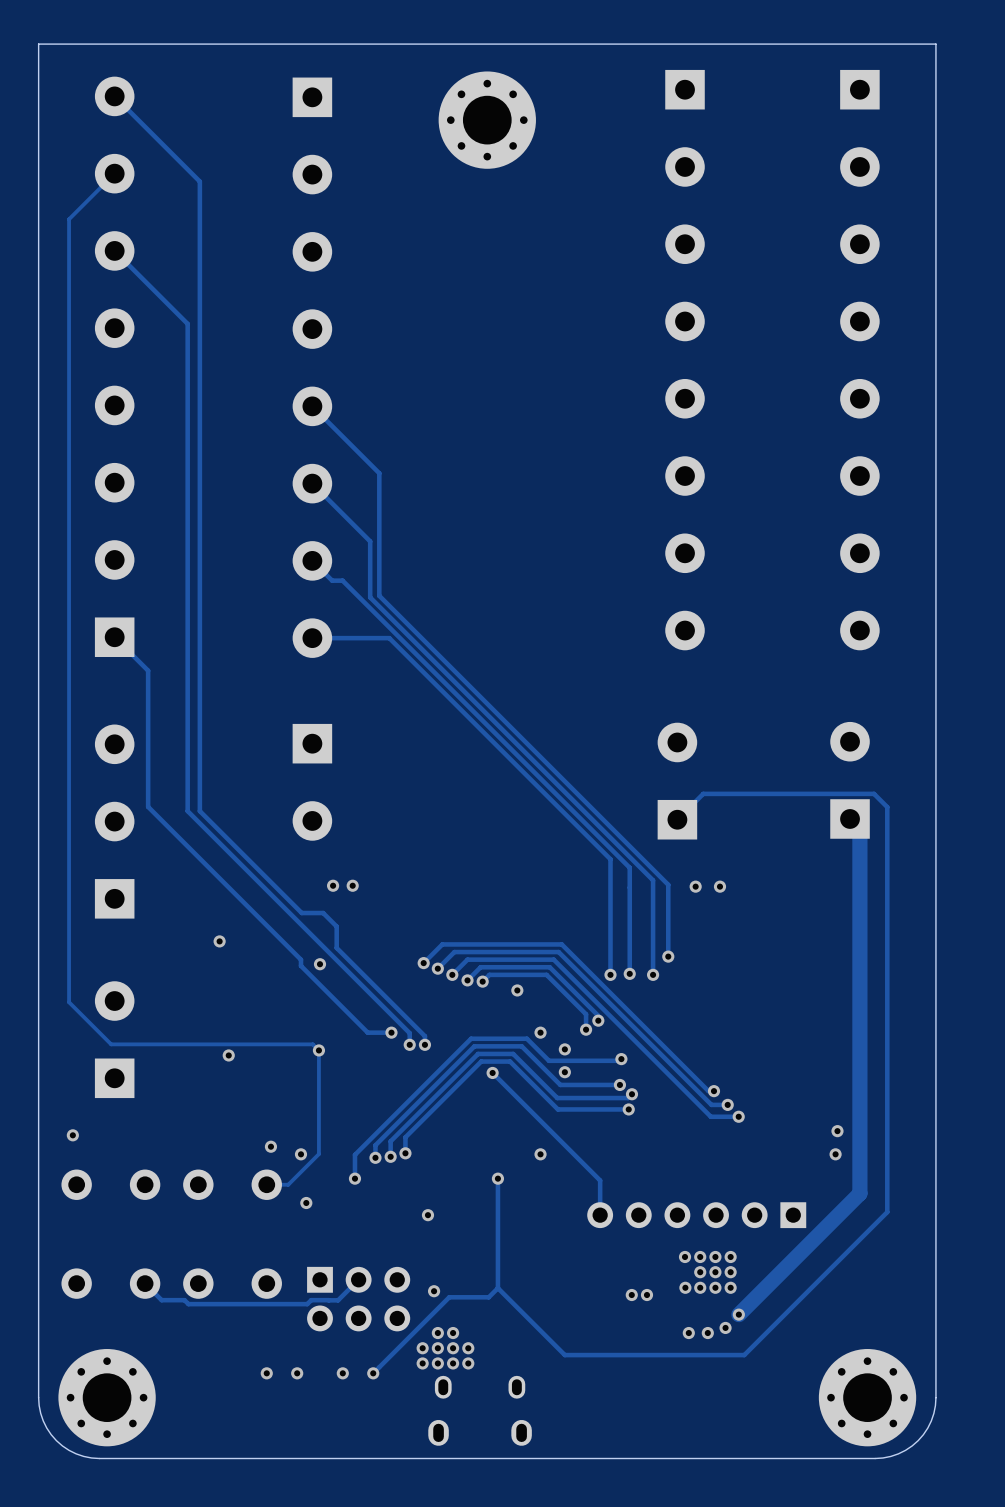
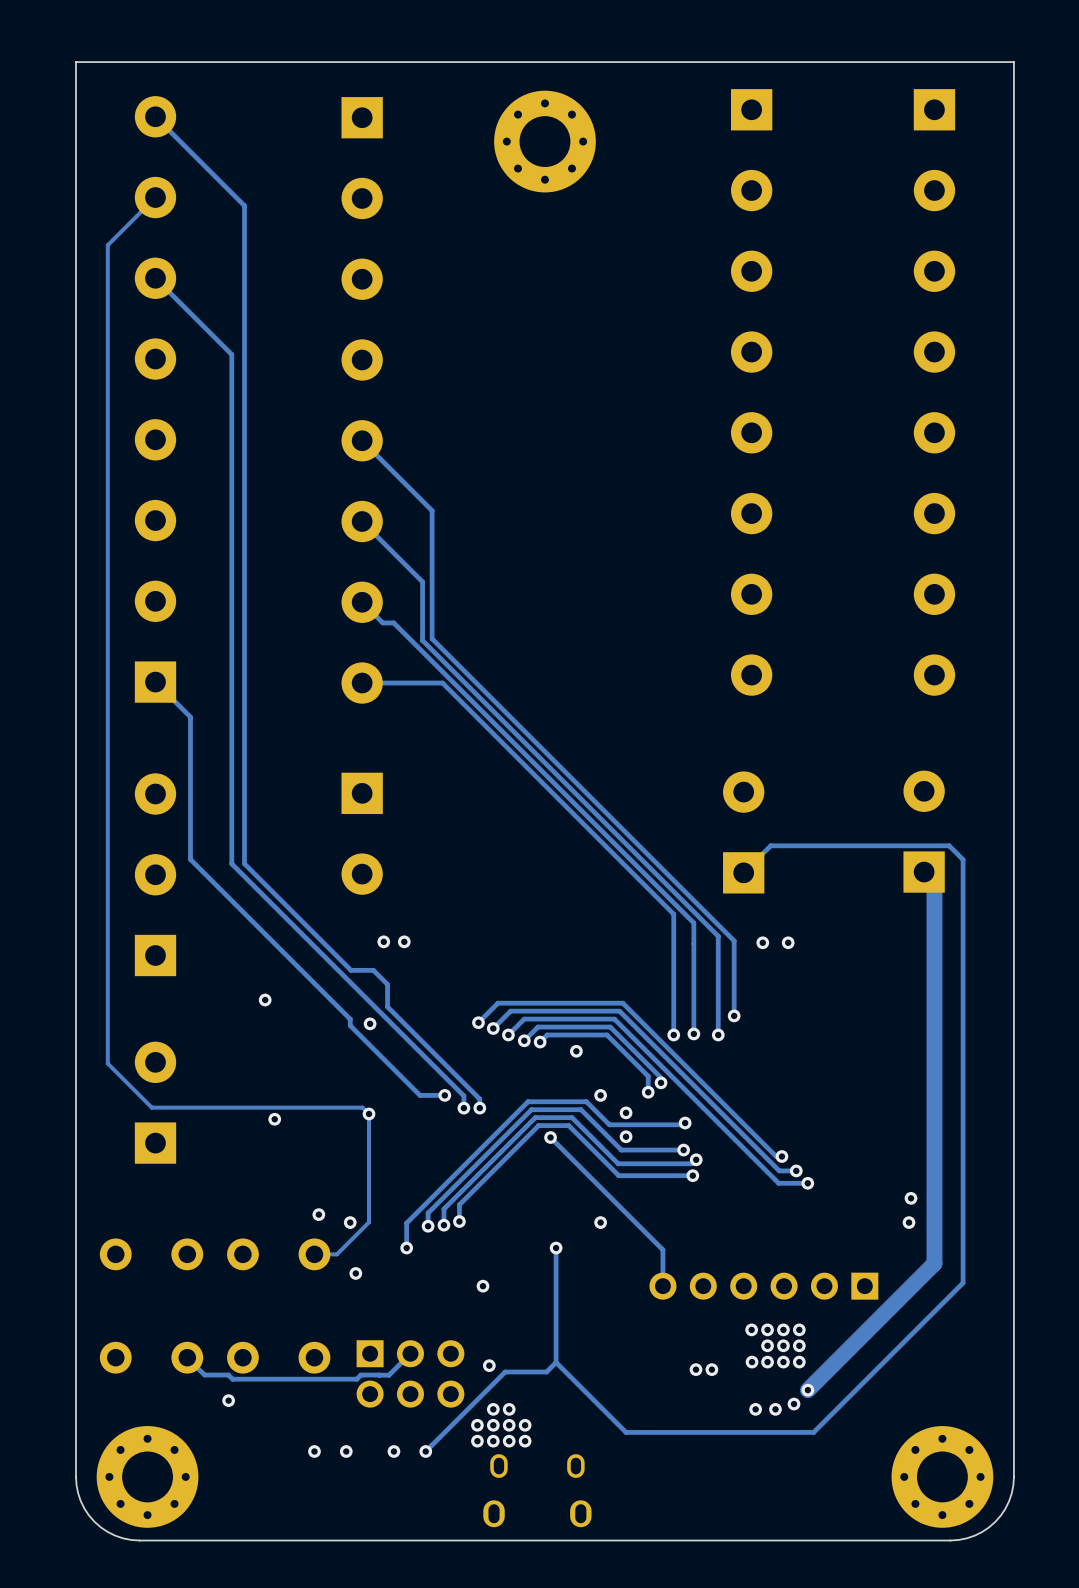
via: (72, 1135) -> none
via: none -> (228, 1400)

